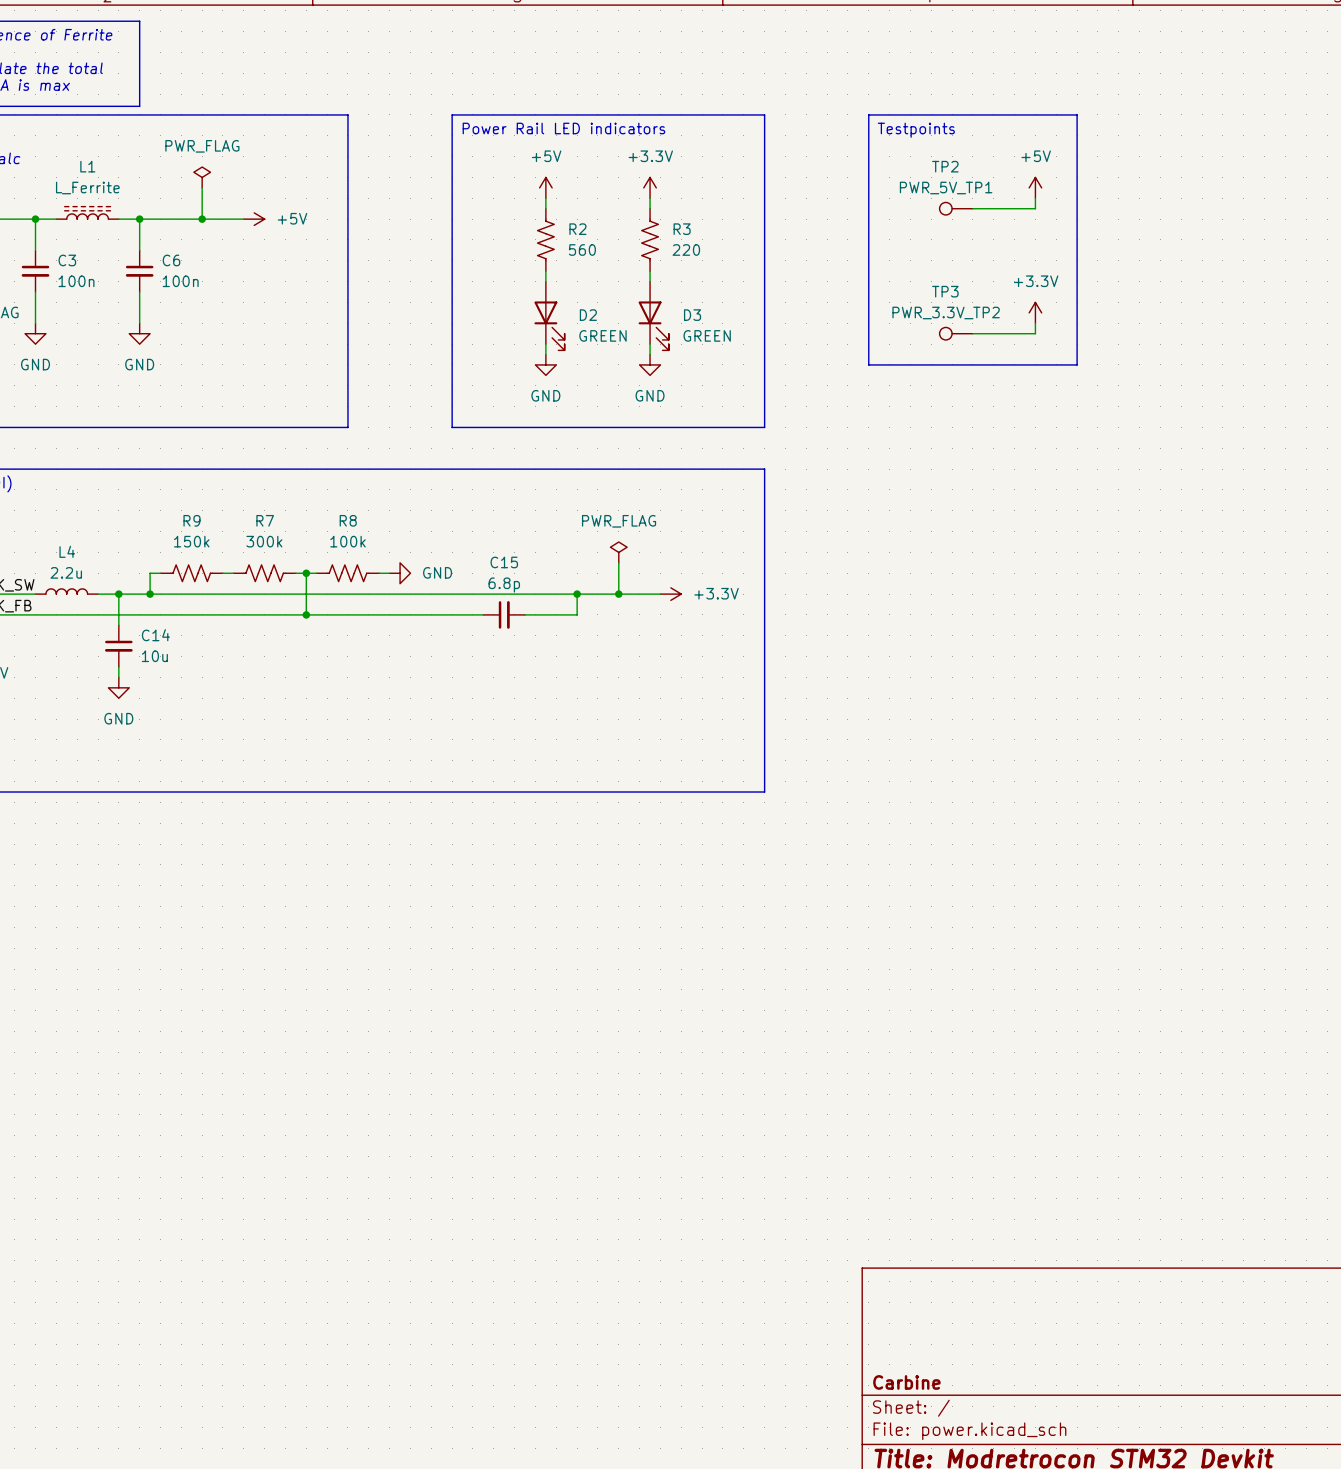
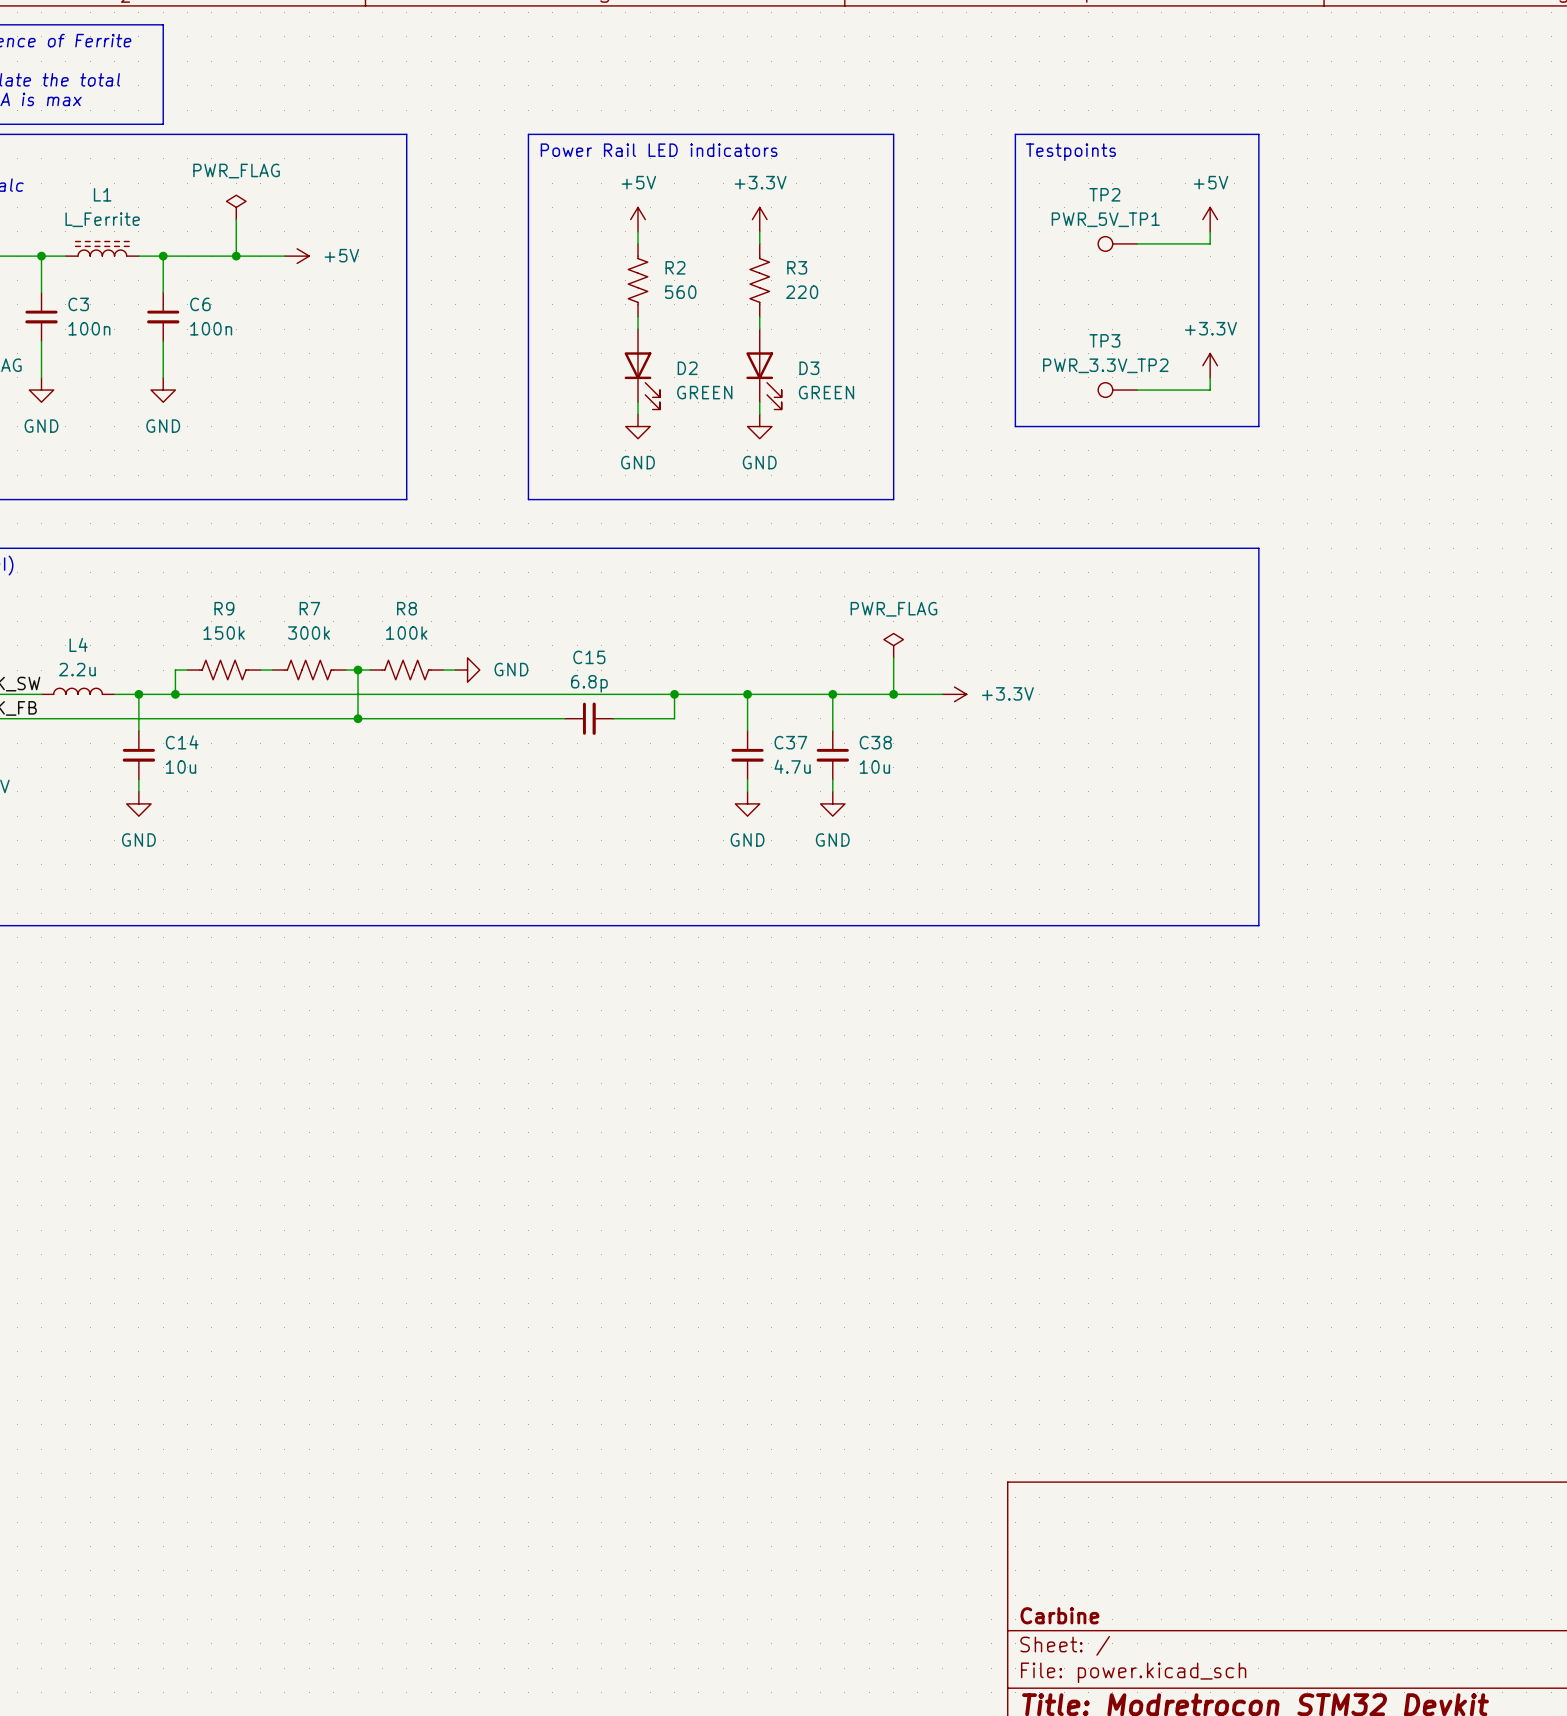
line: (764, 469) (764, 792) -> (893, 548) (1258, 548) (1258, 925) (893, 925)
power symbol position: PWR_FLAG (618, 552) -> PWR_FLAG (893, 645)
wire: (618, 562) (618, 594) -> (747, 694) (747, 730)
junction position: (618, 594) -> (747, 694)
wire: none -> (771, 694) (942, 694)
power symbol position: +3.3V (670, 594) -> +3.3V (954, 694)
wire: none -> (832, 694) (832, 730)
junction: none -> (832, 694)
junction: none -> (893, 694)
C37: none -> 4.7u (747, 755)
C38: none -> 10u (832, 755)
wire: none -> (747, 779) (747, 791)
wire: none -> (832, 779) (832, 791)
power symbol: none -> GND (747, 803)
power symbol: none -> GND (832, 803)

